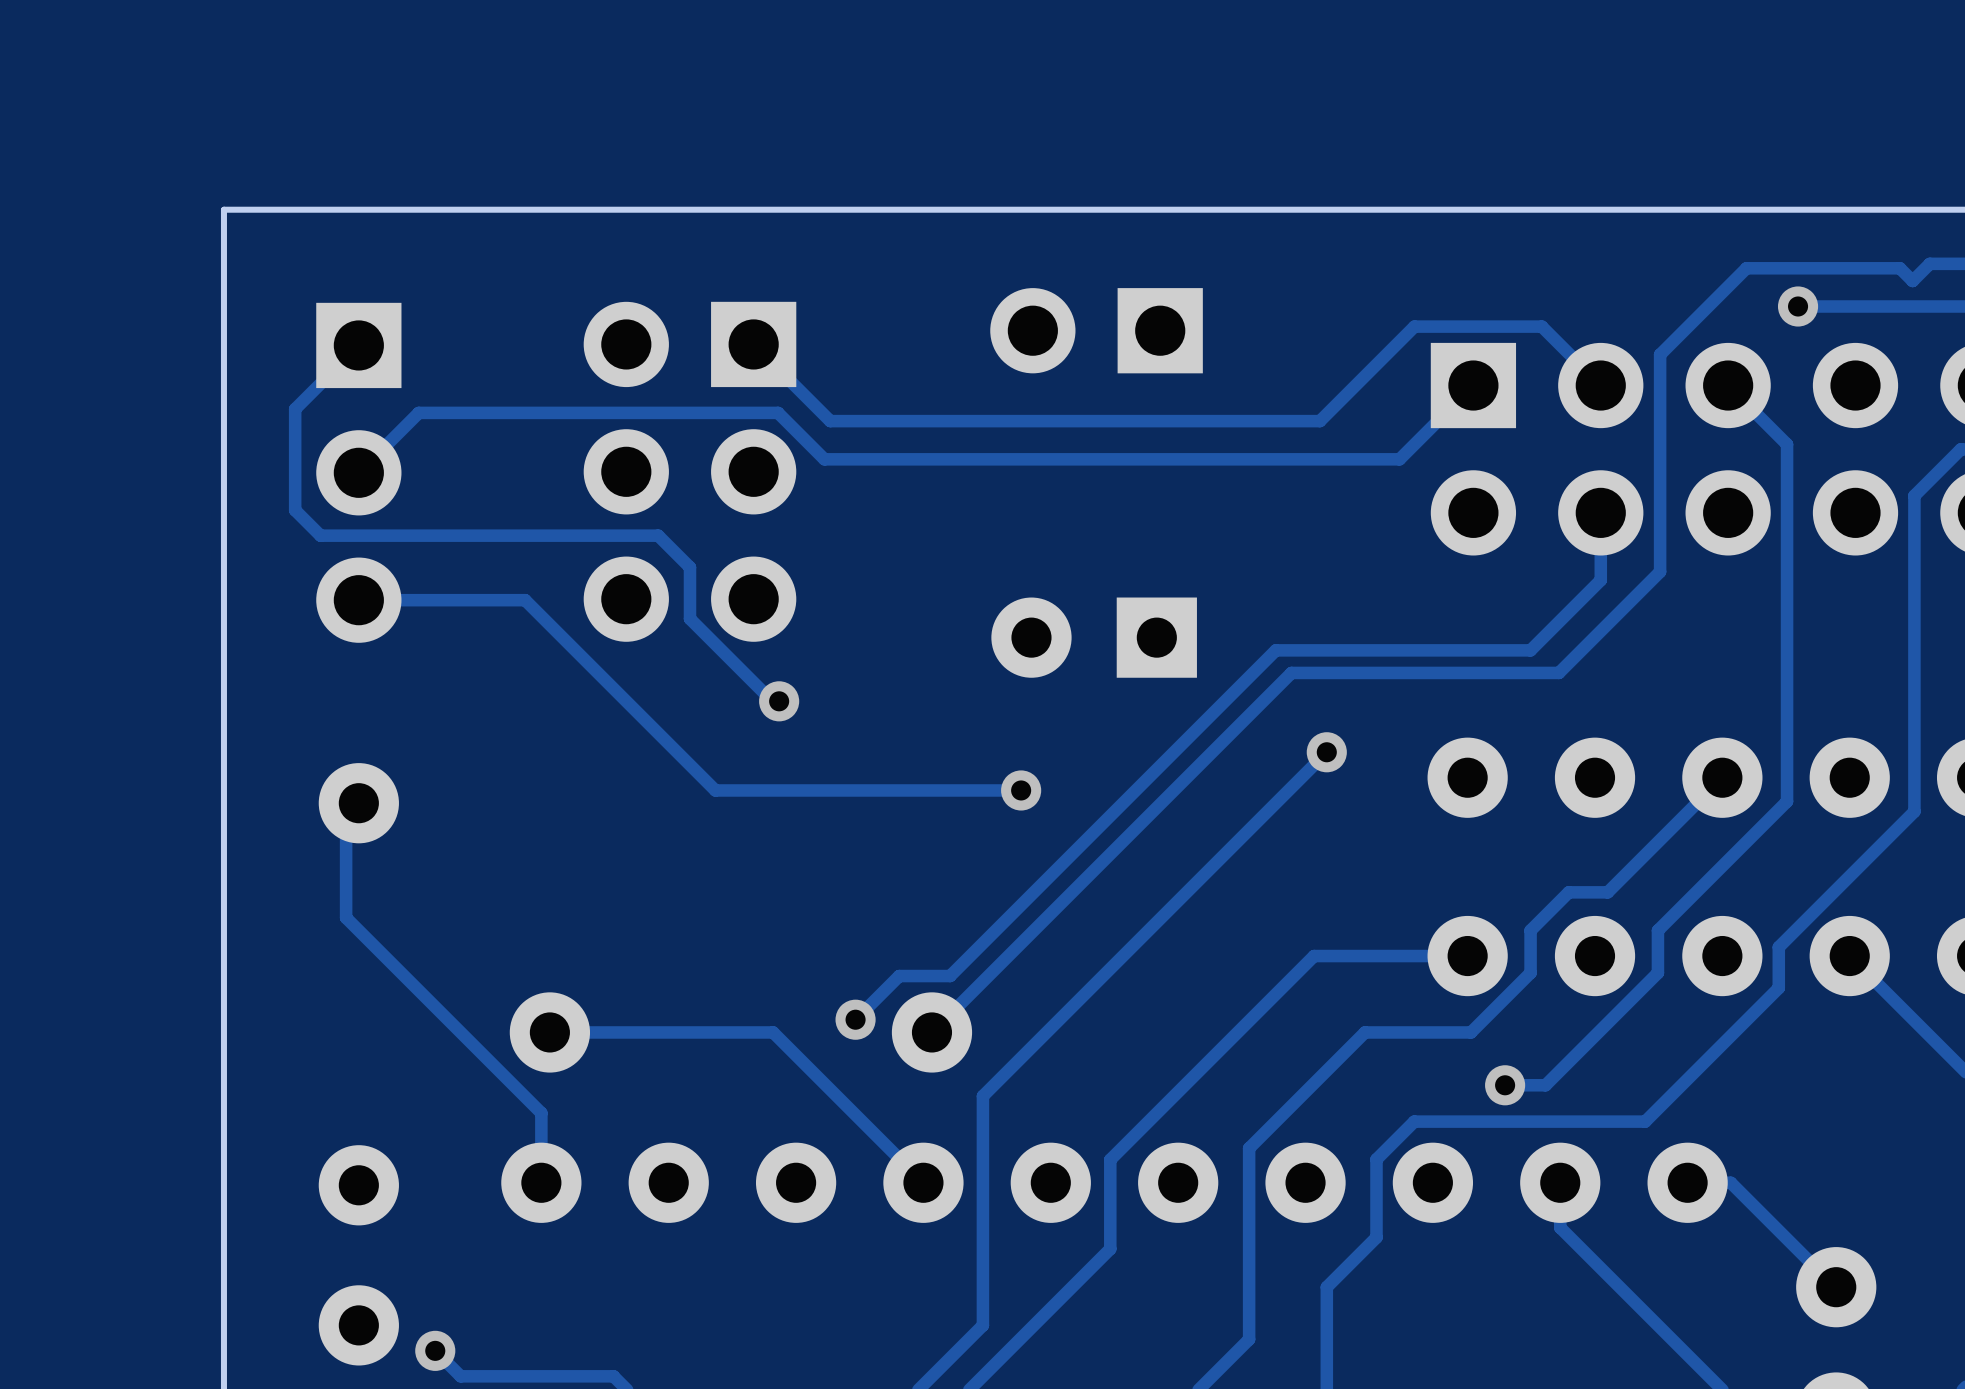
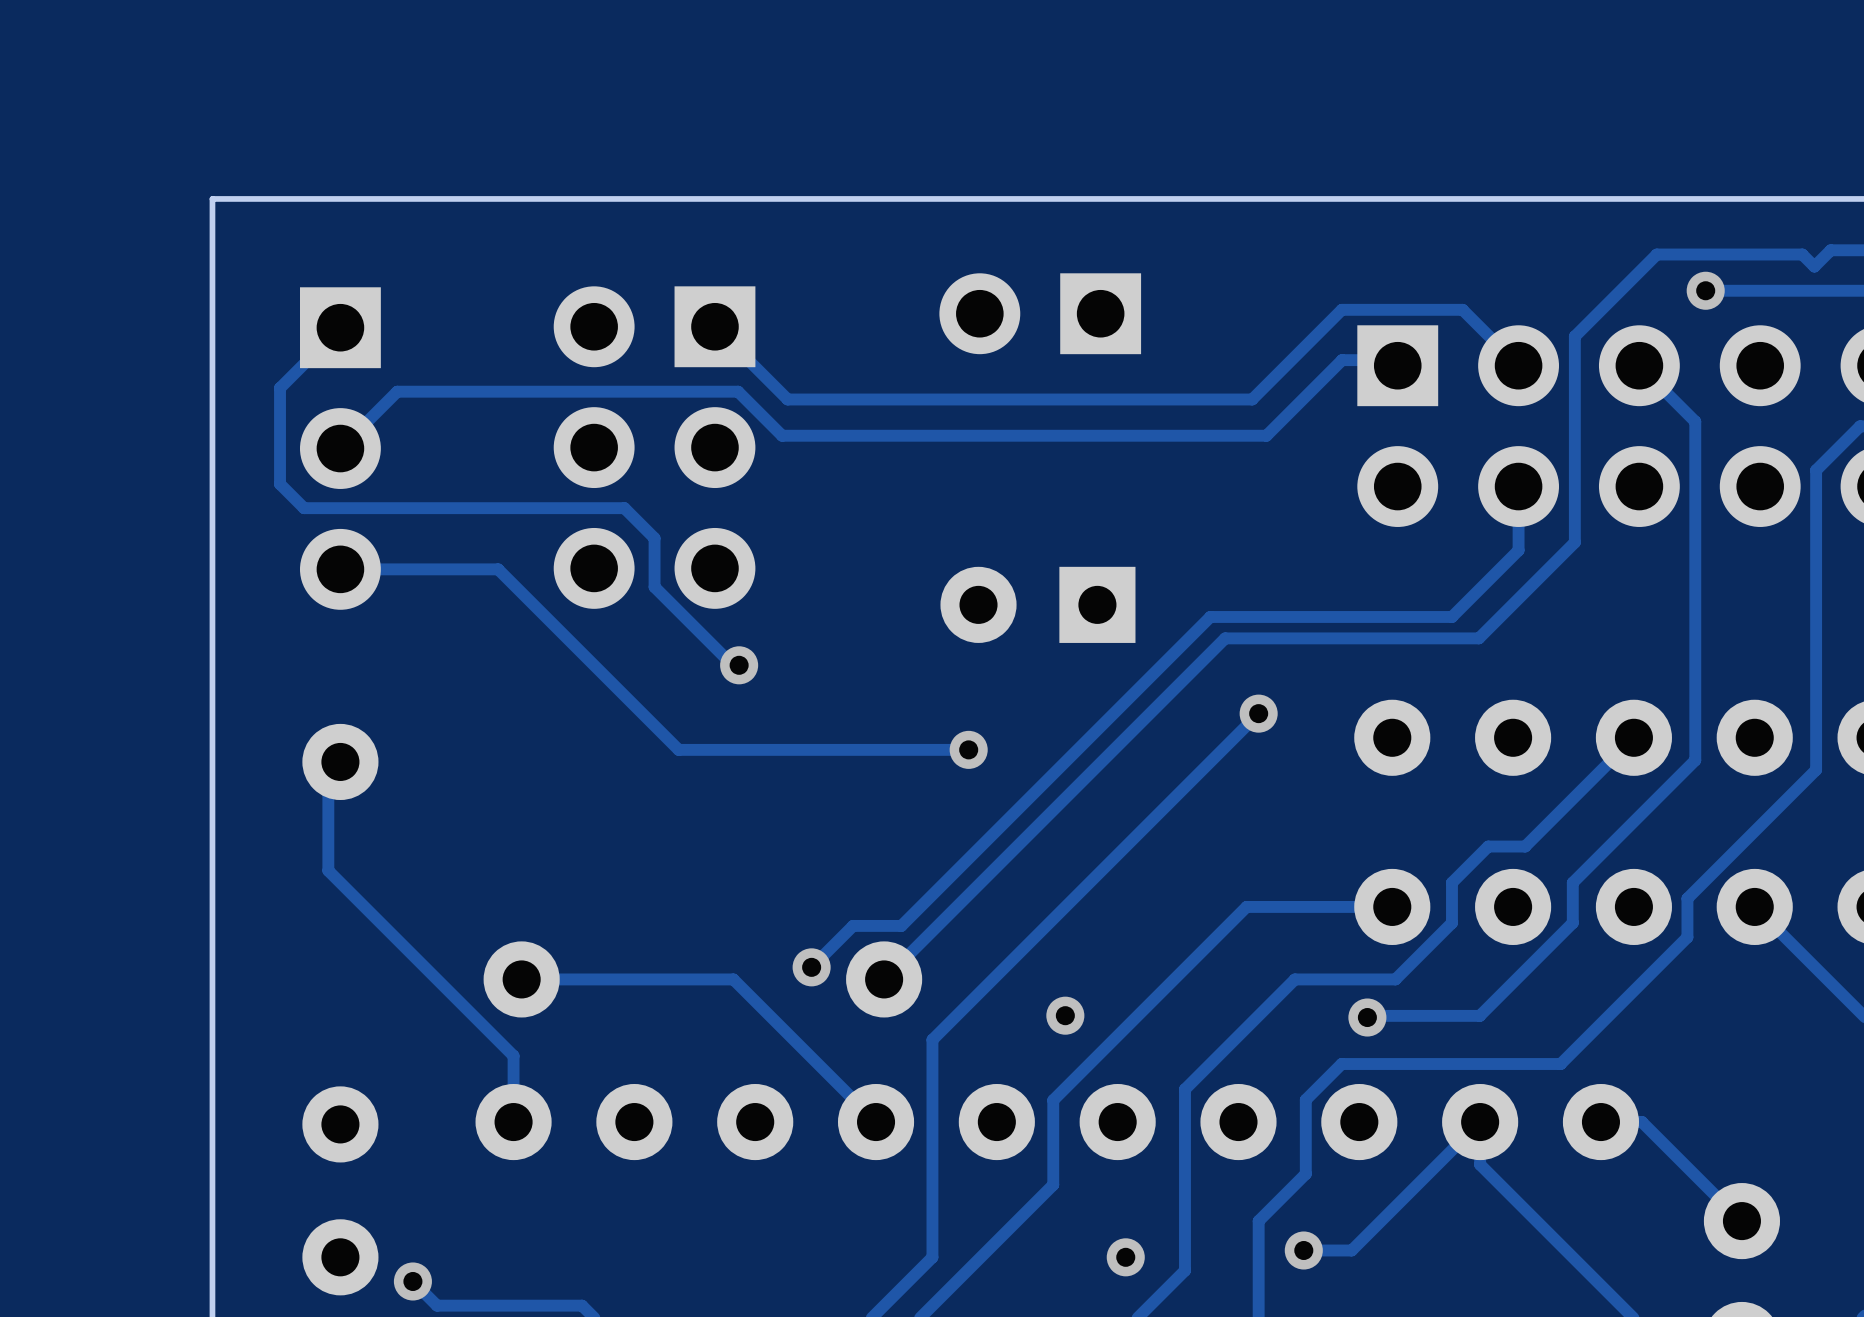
track: (1473, 385) (1399, 459) (1335, 459) -> (1397, 365) (1392, 360) (1342, 360) (1266, 435)
via: none -> (1065, 1015)
track: (1559, 1070) (1545, 1085) (1505, 1085) -> (1479, 1015) (1369, 1015) (1367, 1017)
via position: (1505, 1085) -> (1367, 1017)
track: none -> (1480, 1122) (1351, 1250) (1303, 1250)
via: none -> (1303, 1250)
via: none -> (1125, 1257)

